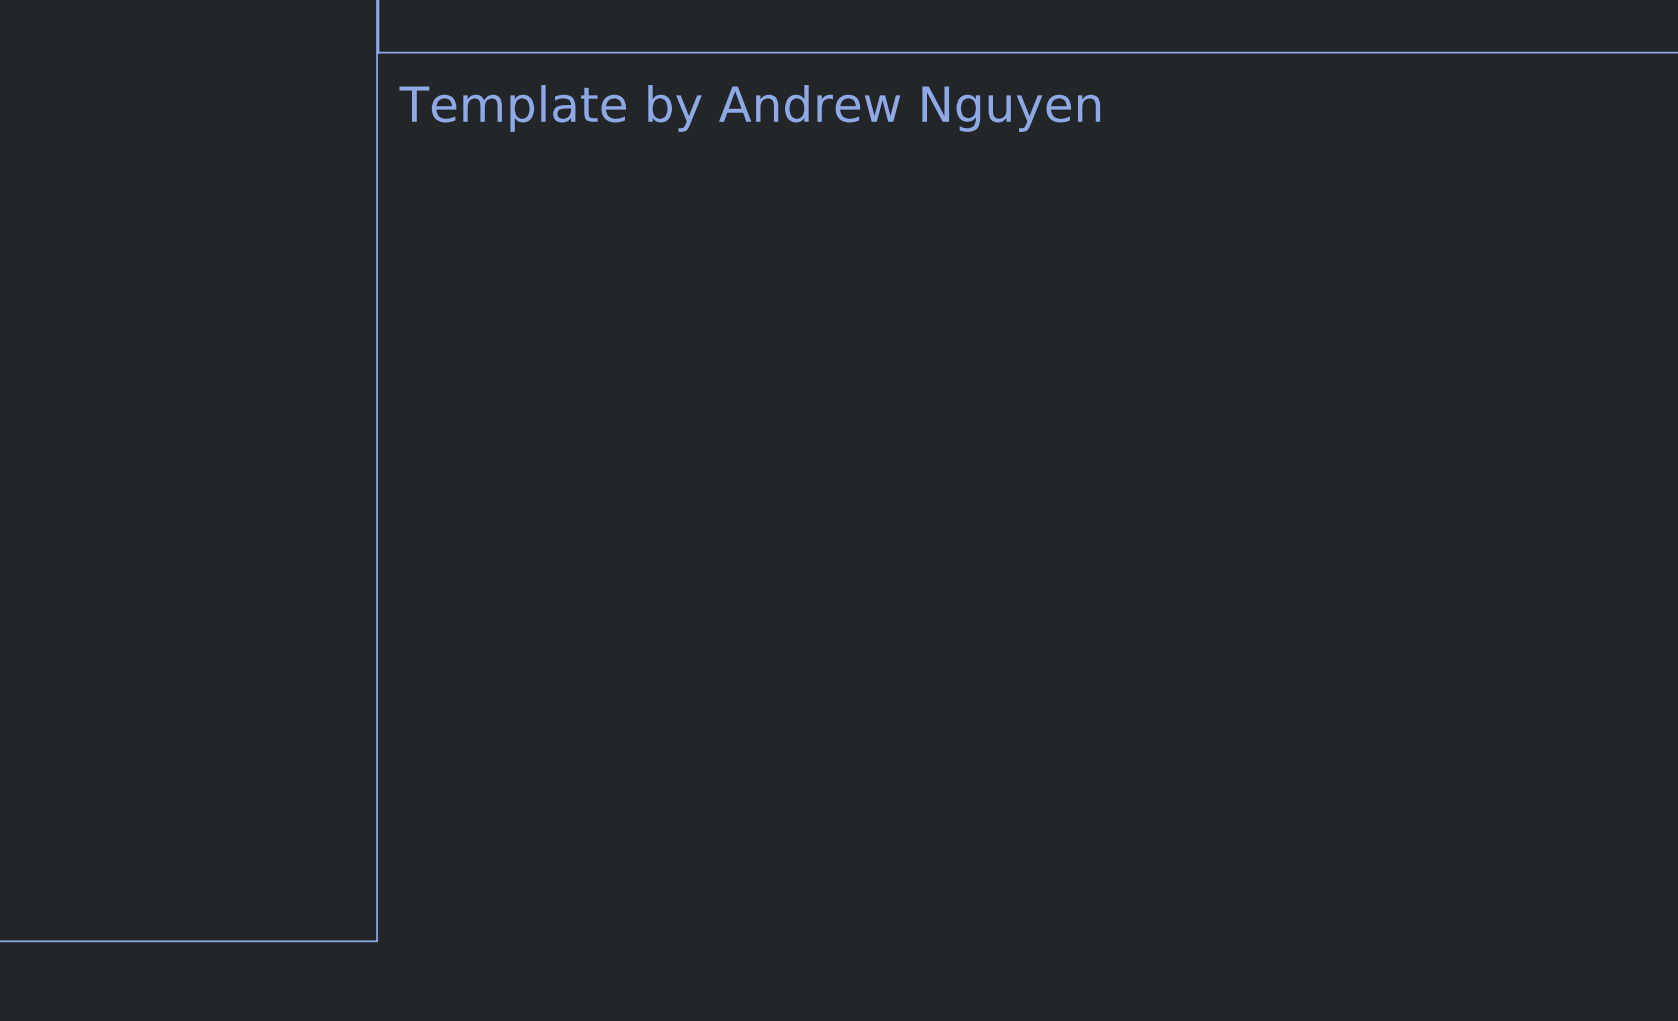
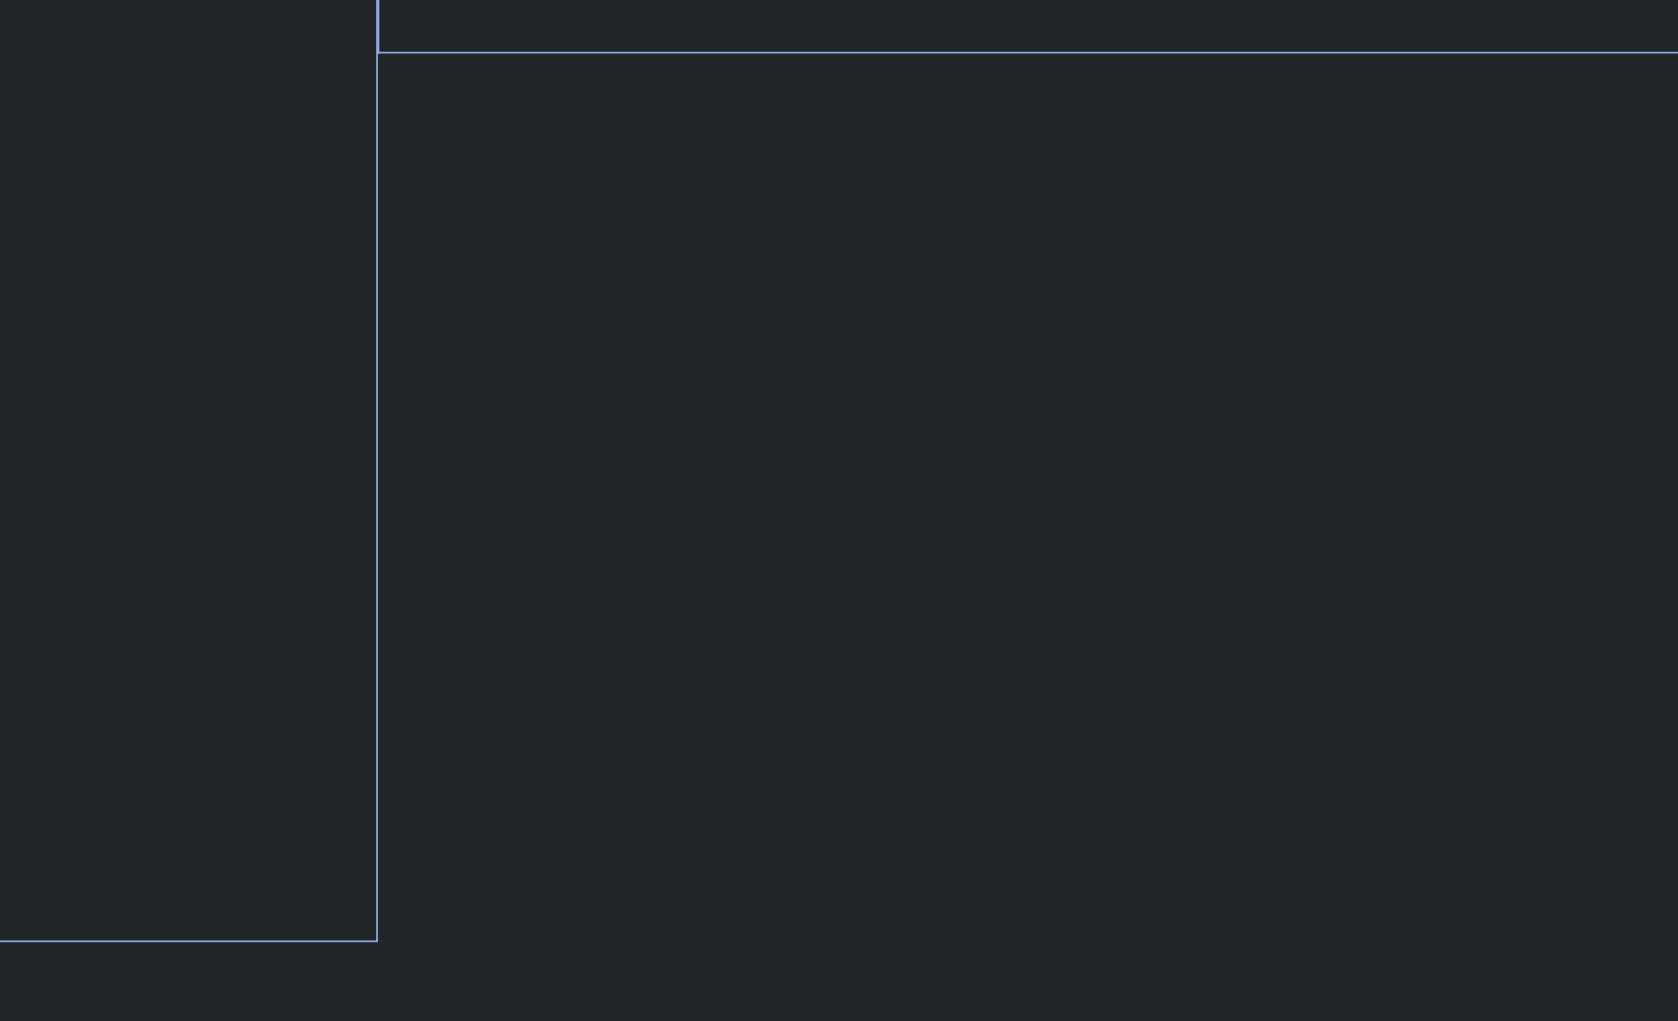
text: Template by Andrew Nguyen (749, 108) -> none

